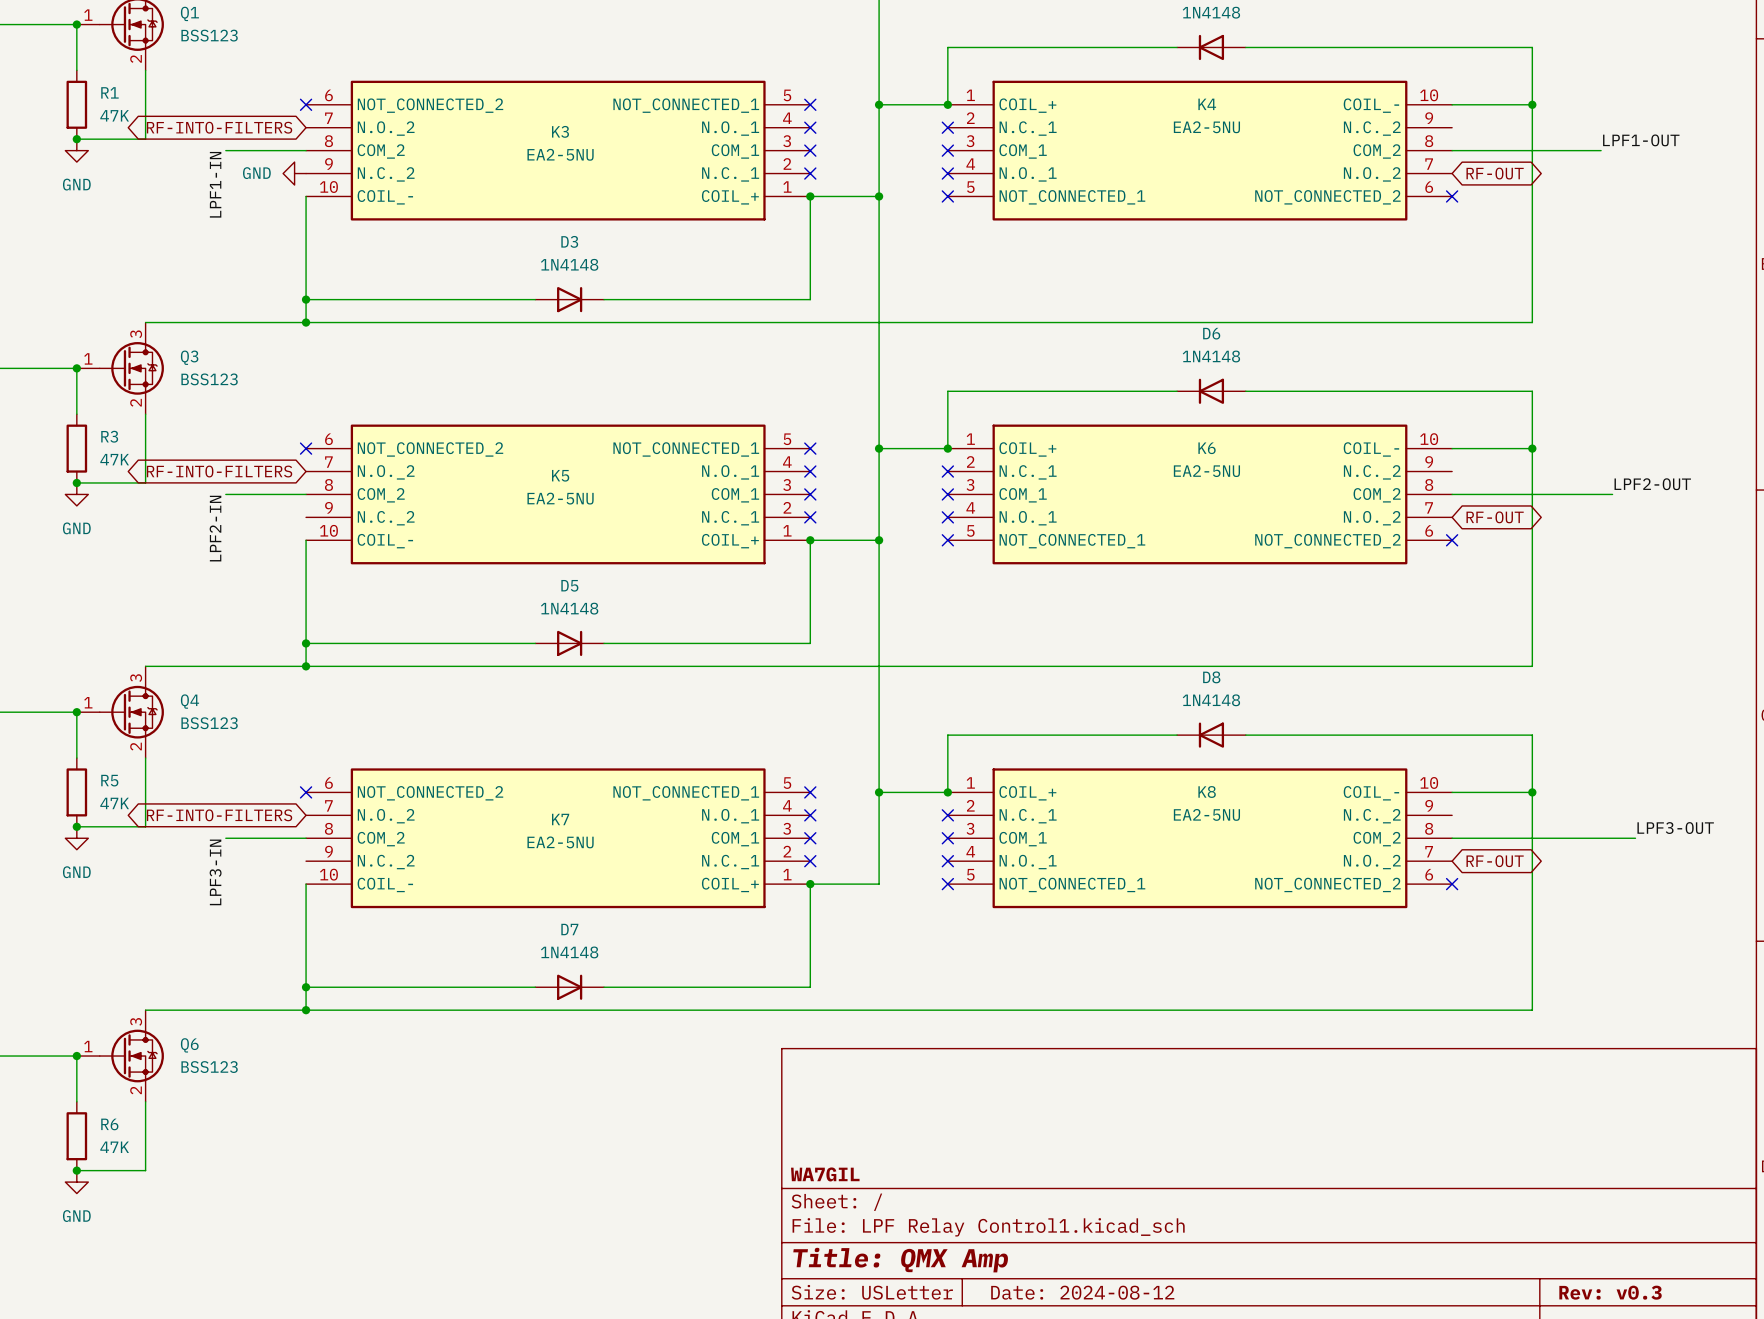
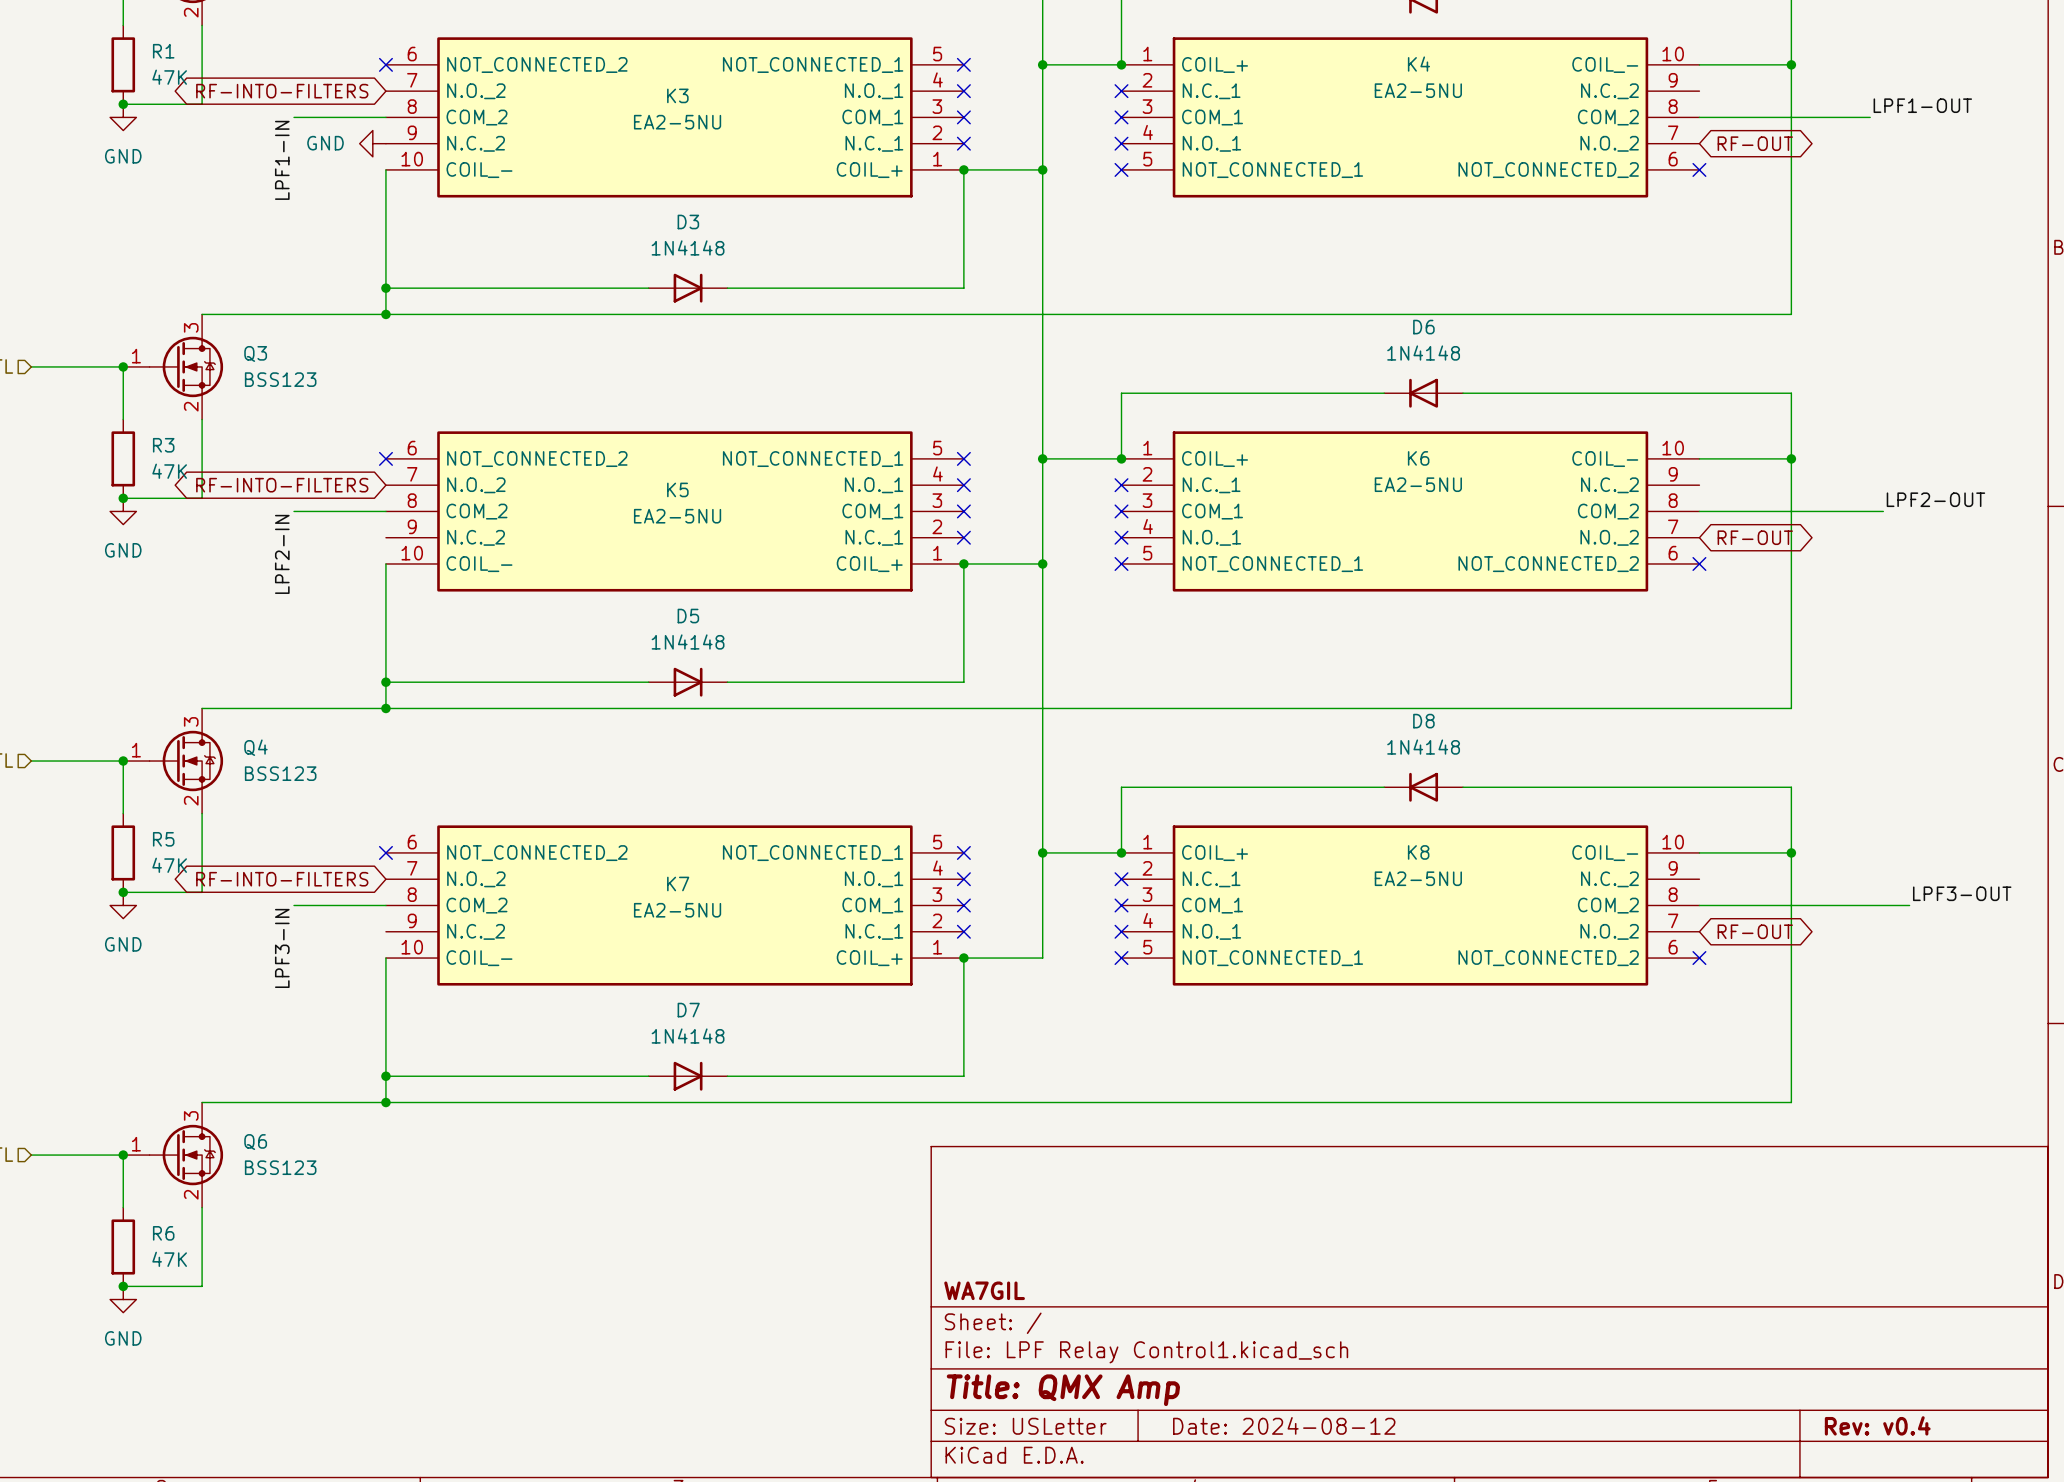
title block: Rev: v0.3 (1610, 1292) -> Rev: v0.4 (1877, 1425)

